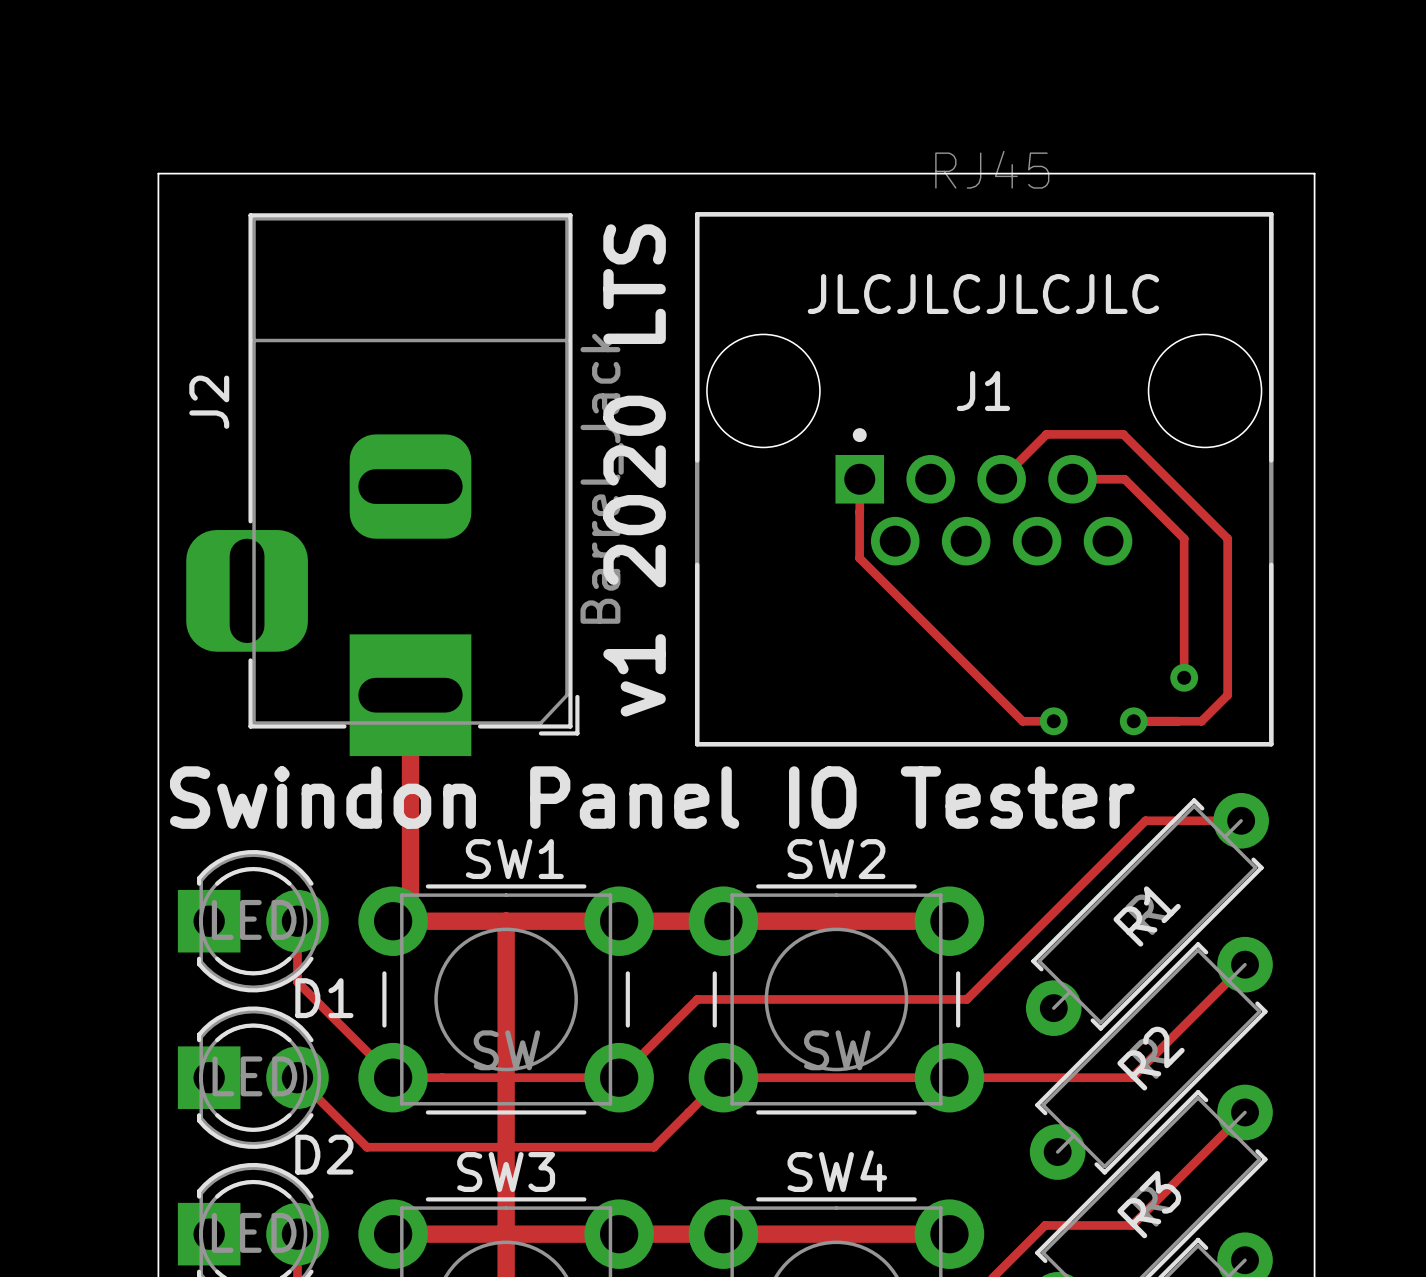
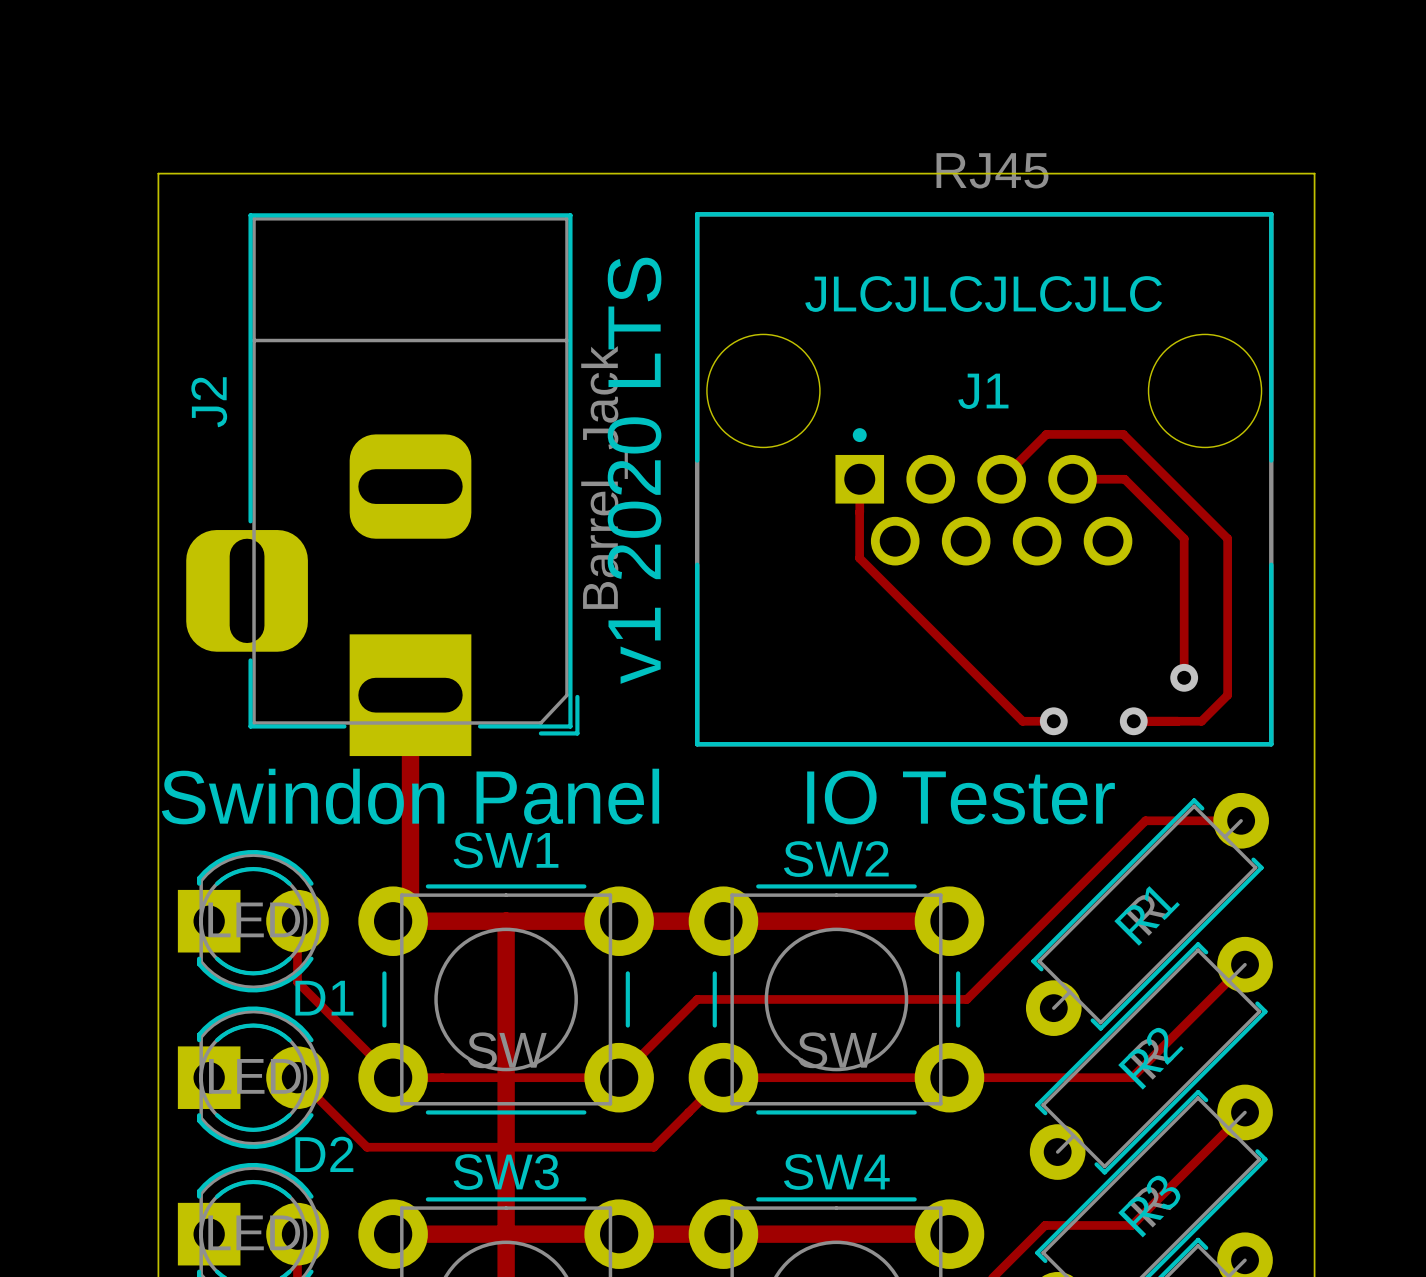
SW1 name position: SW1 (514, 859) -> SW1 (506, 850)

